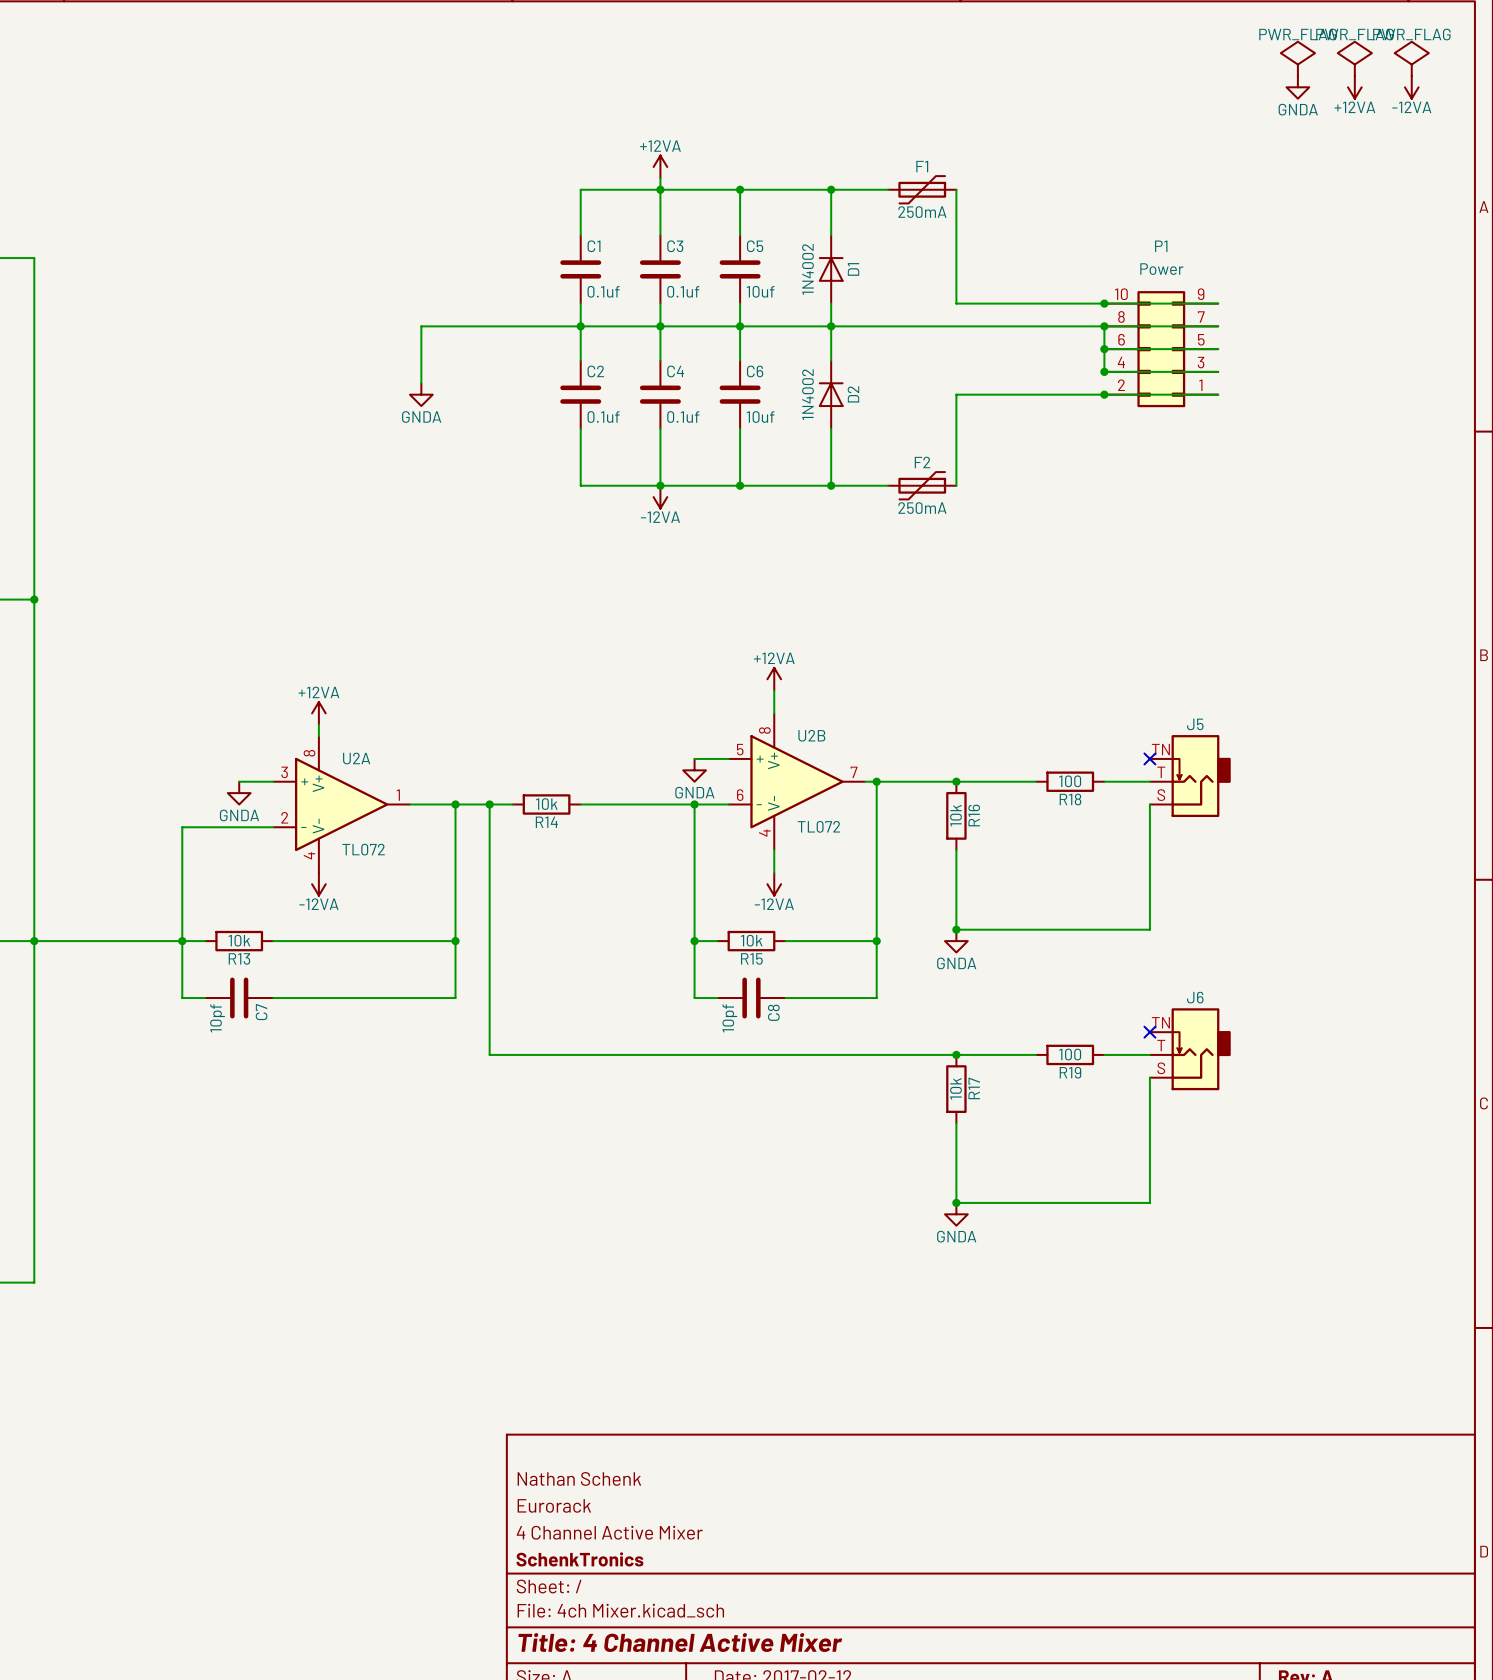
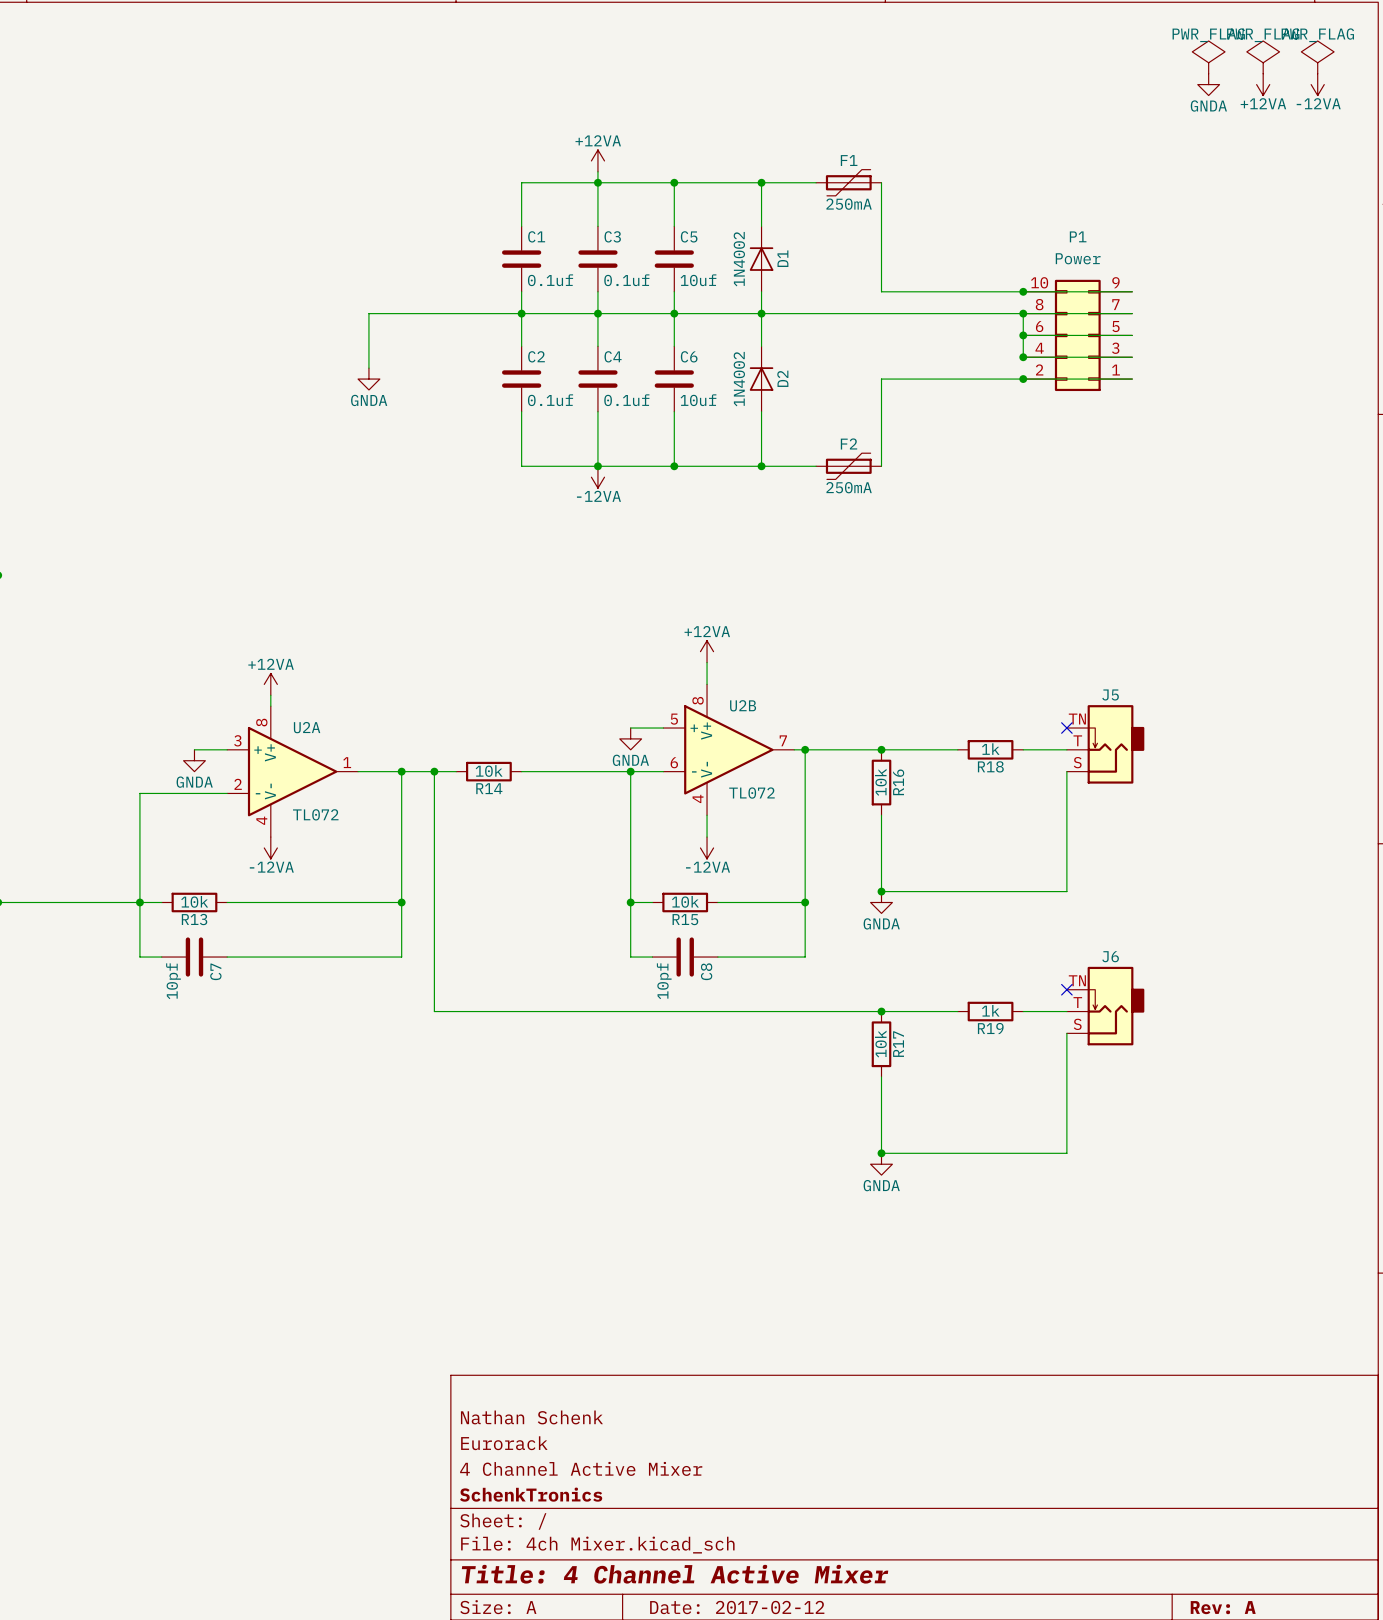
R18 value: 100 (1070, 781) -> 1k (990, 749)
R19 value: 100 (1070, 1054) -> 1k (990, 1010)

